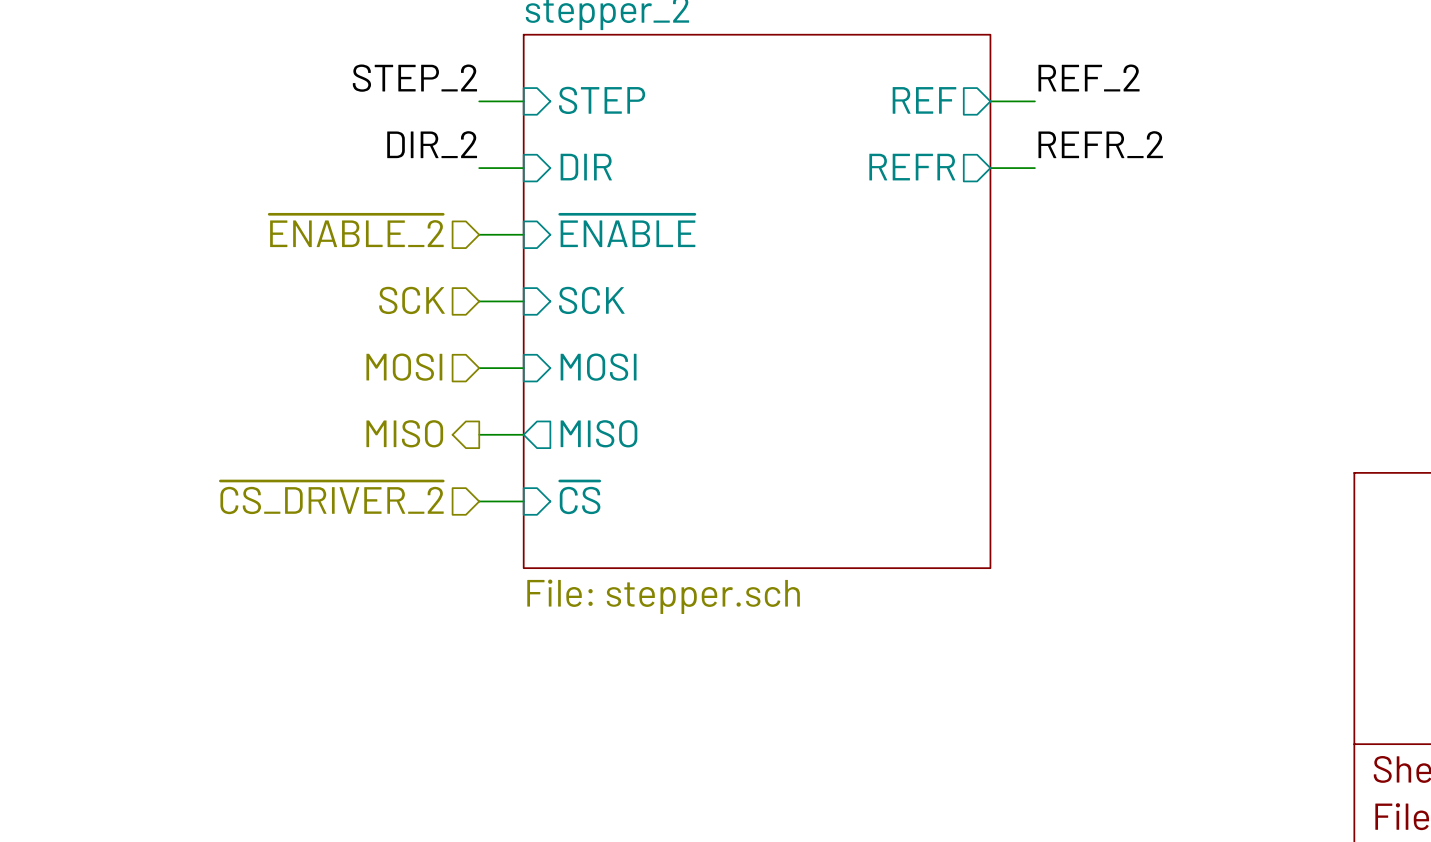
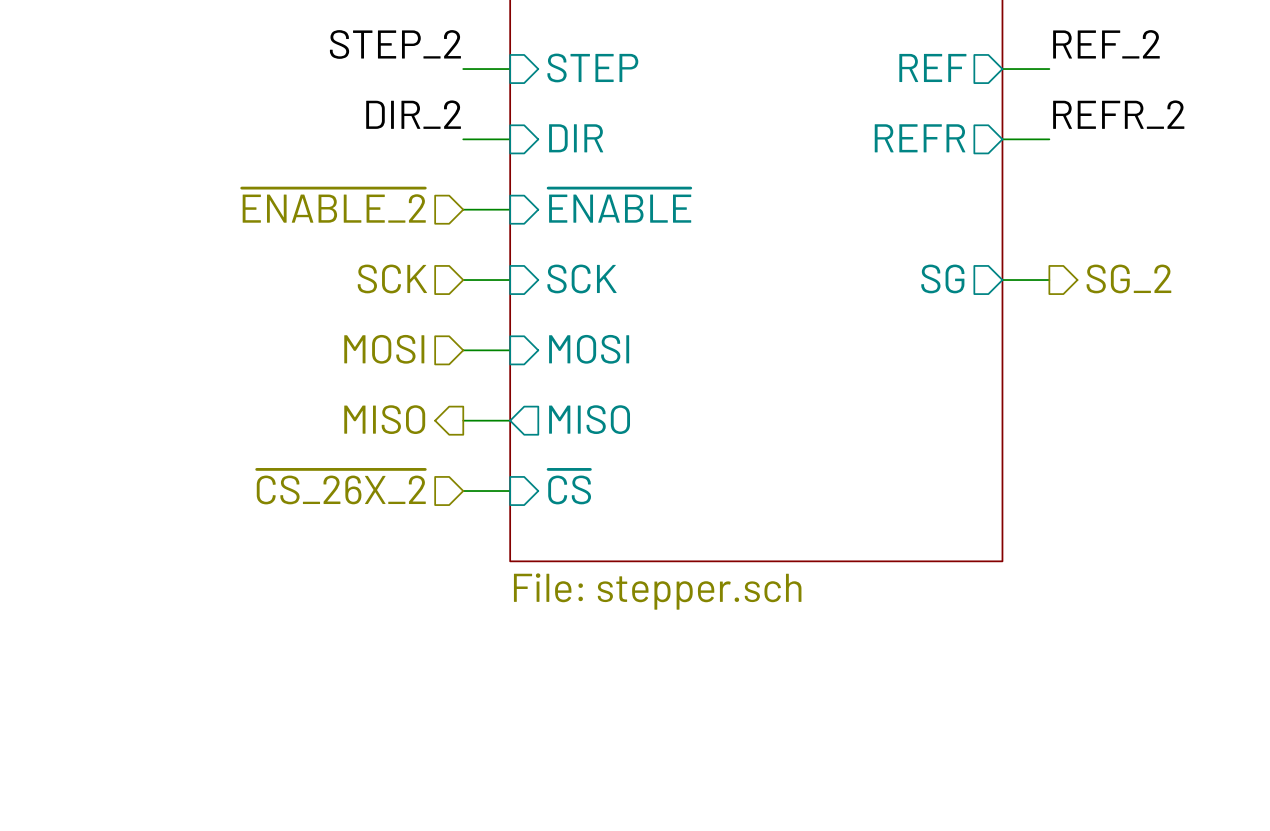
sheet pin: none -> SG (942, 278)
hierarchical label: none -> SG_2 (1128, 278)
wire: none -> (1002, 280) (1049, 280)
hierarchical label: ~{CS_DRIVER_2} (332, 497) -> ~{CS_26X_2} (341, 486)

